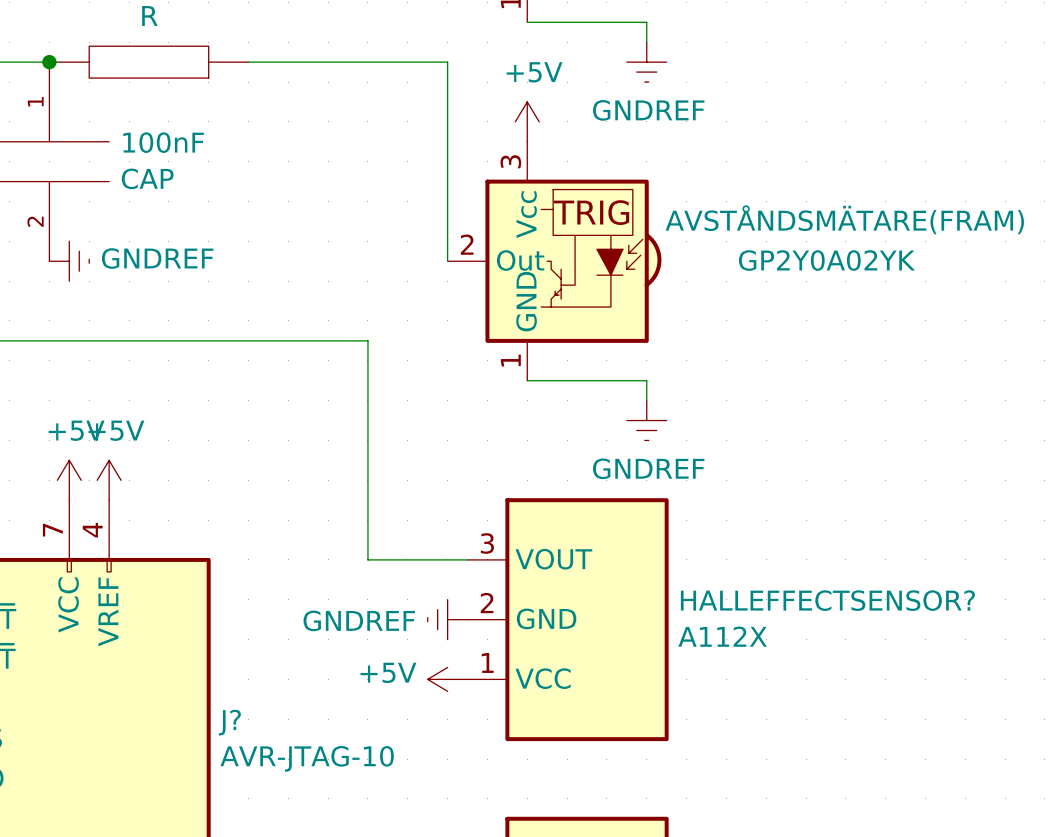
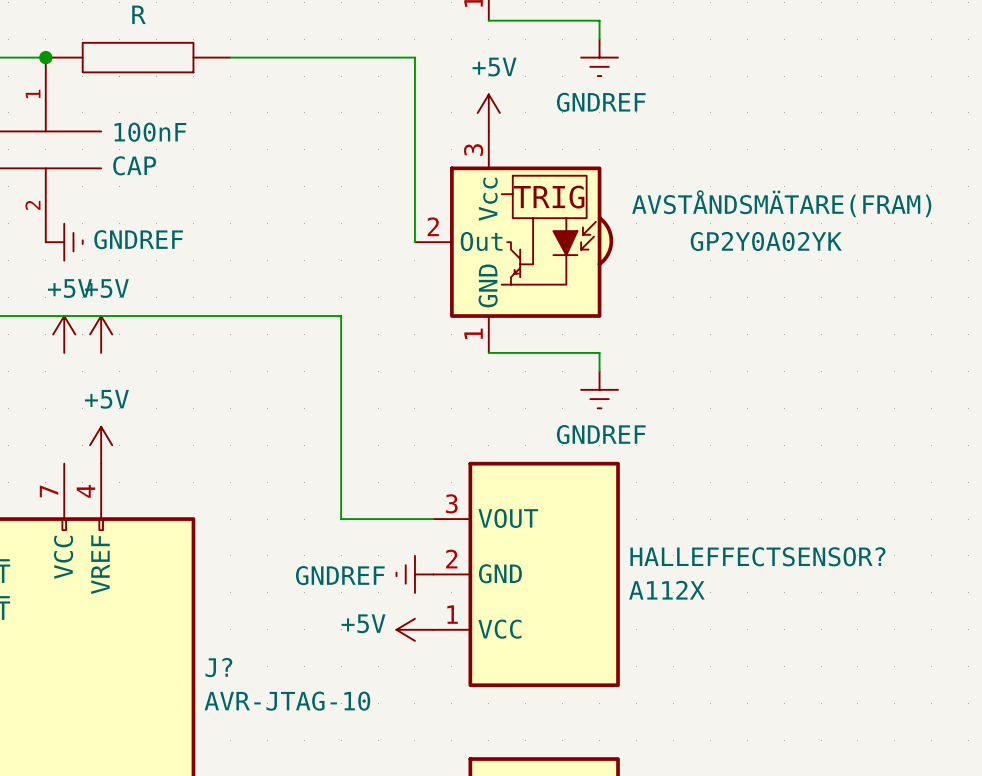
power symbol: none -> +5V (64, 334)
power symbol: none -> +5V (101, 334)
power symbol: +5V (69, 480) -> none

